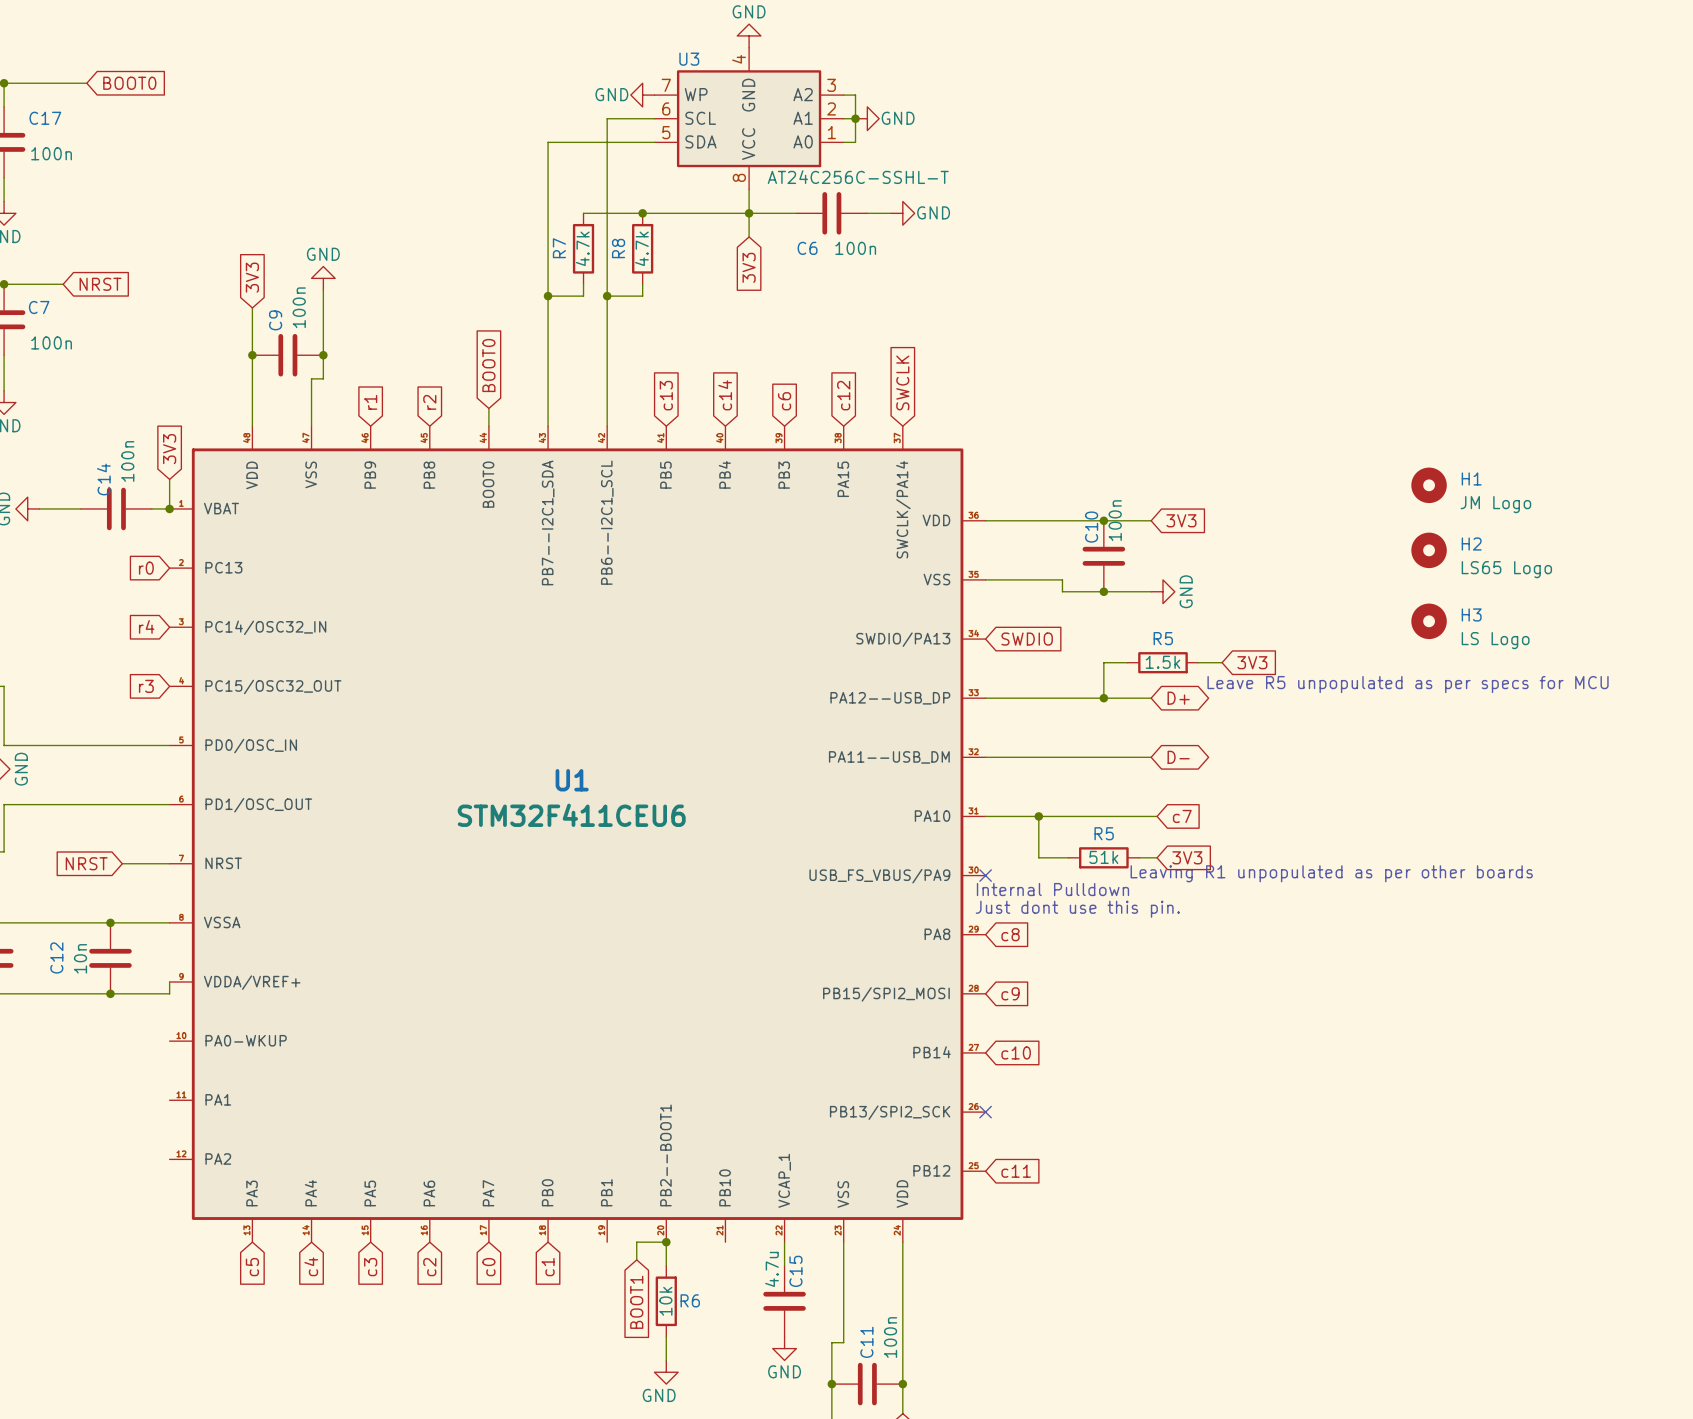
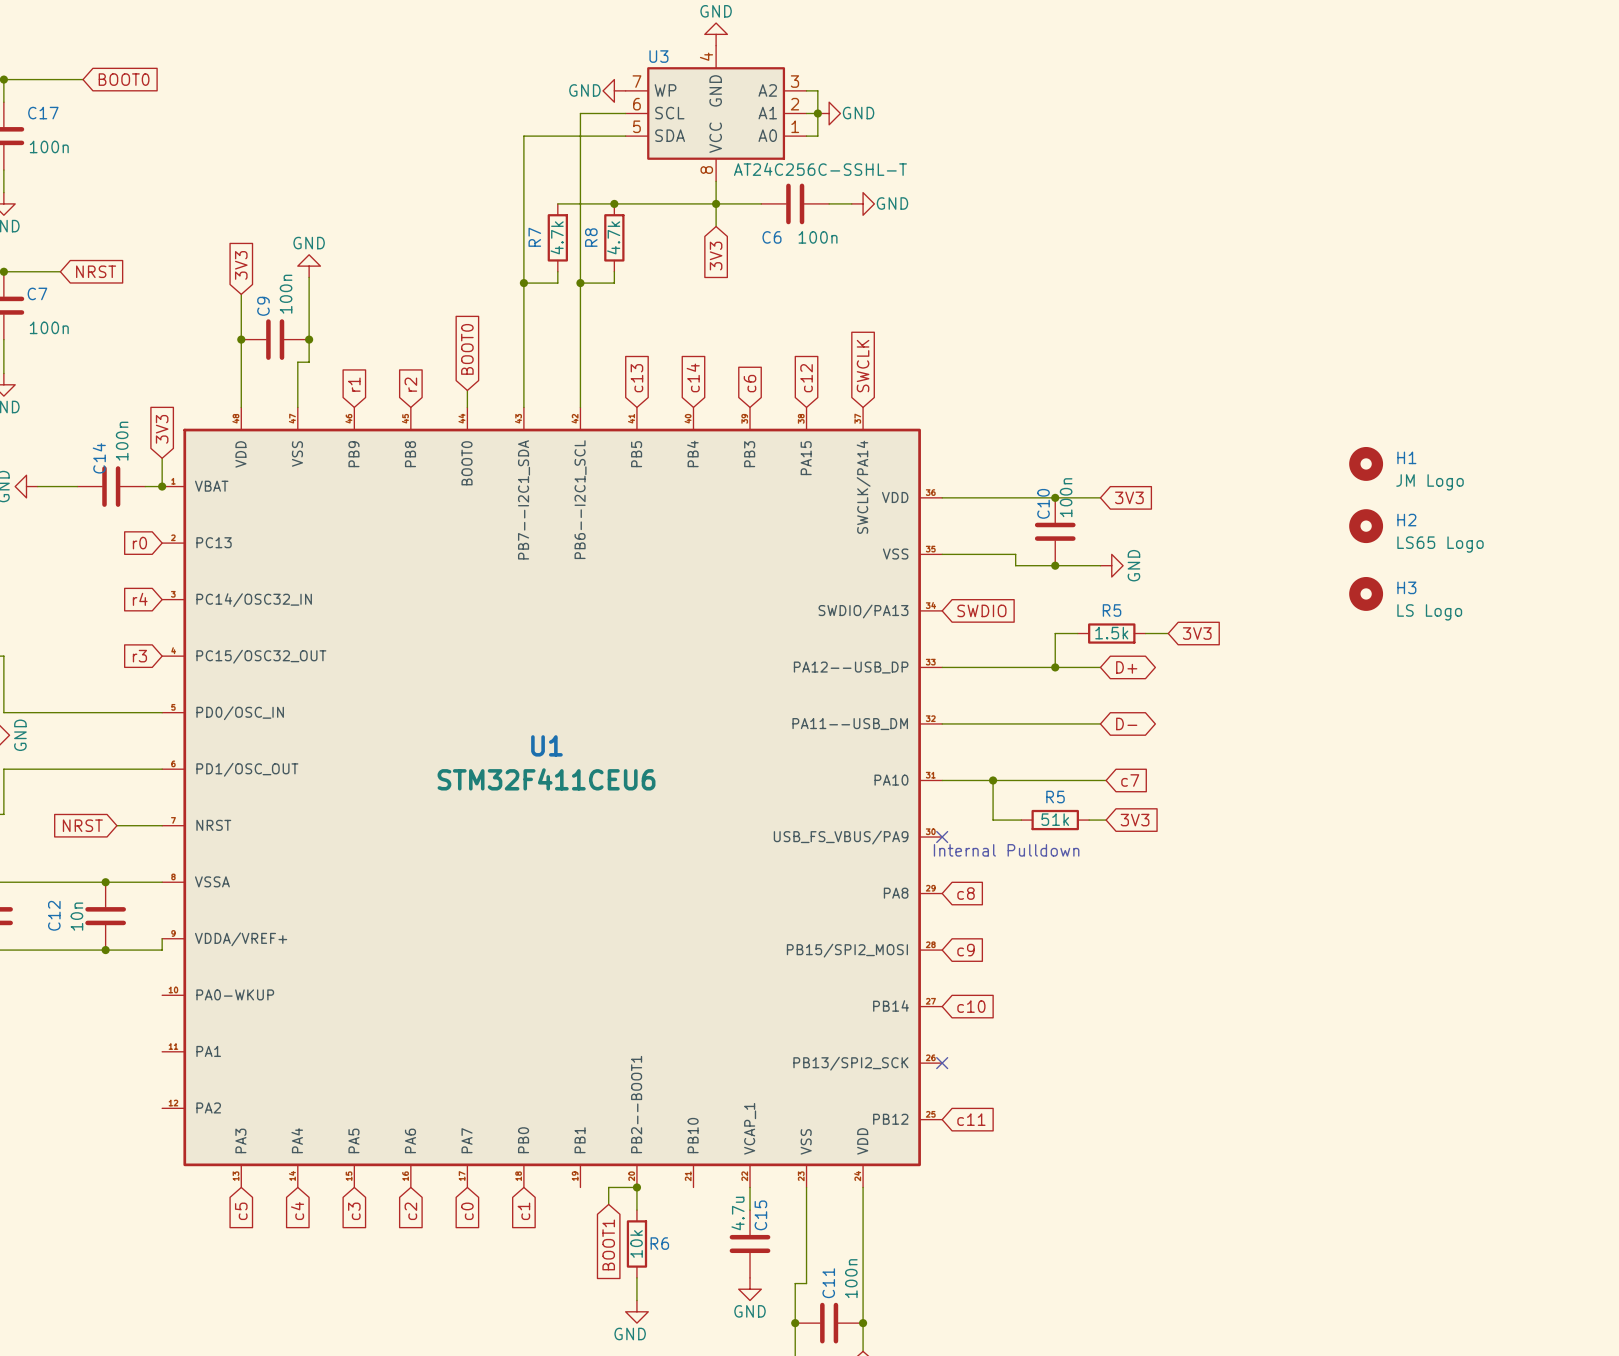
text: Leave R5 unpopulated as per specs for MCU (1408, 684) -> none
text: Leaving R1 unpopulated as per other boards (1331, 873) -> none
text: Just dont use this pin. (1077, 909) -> none

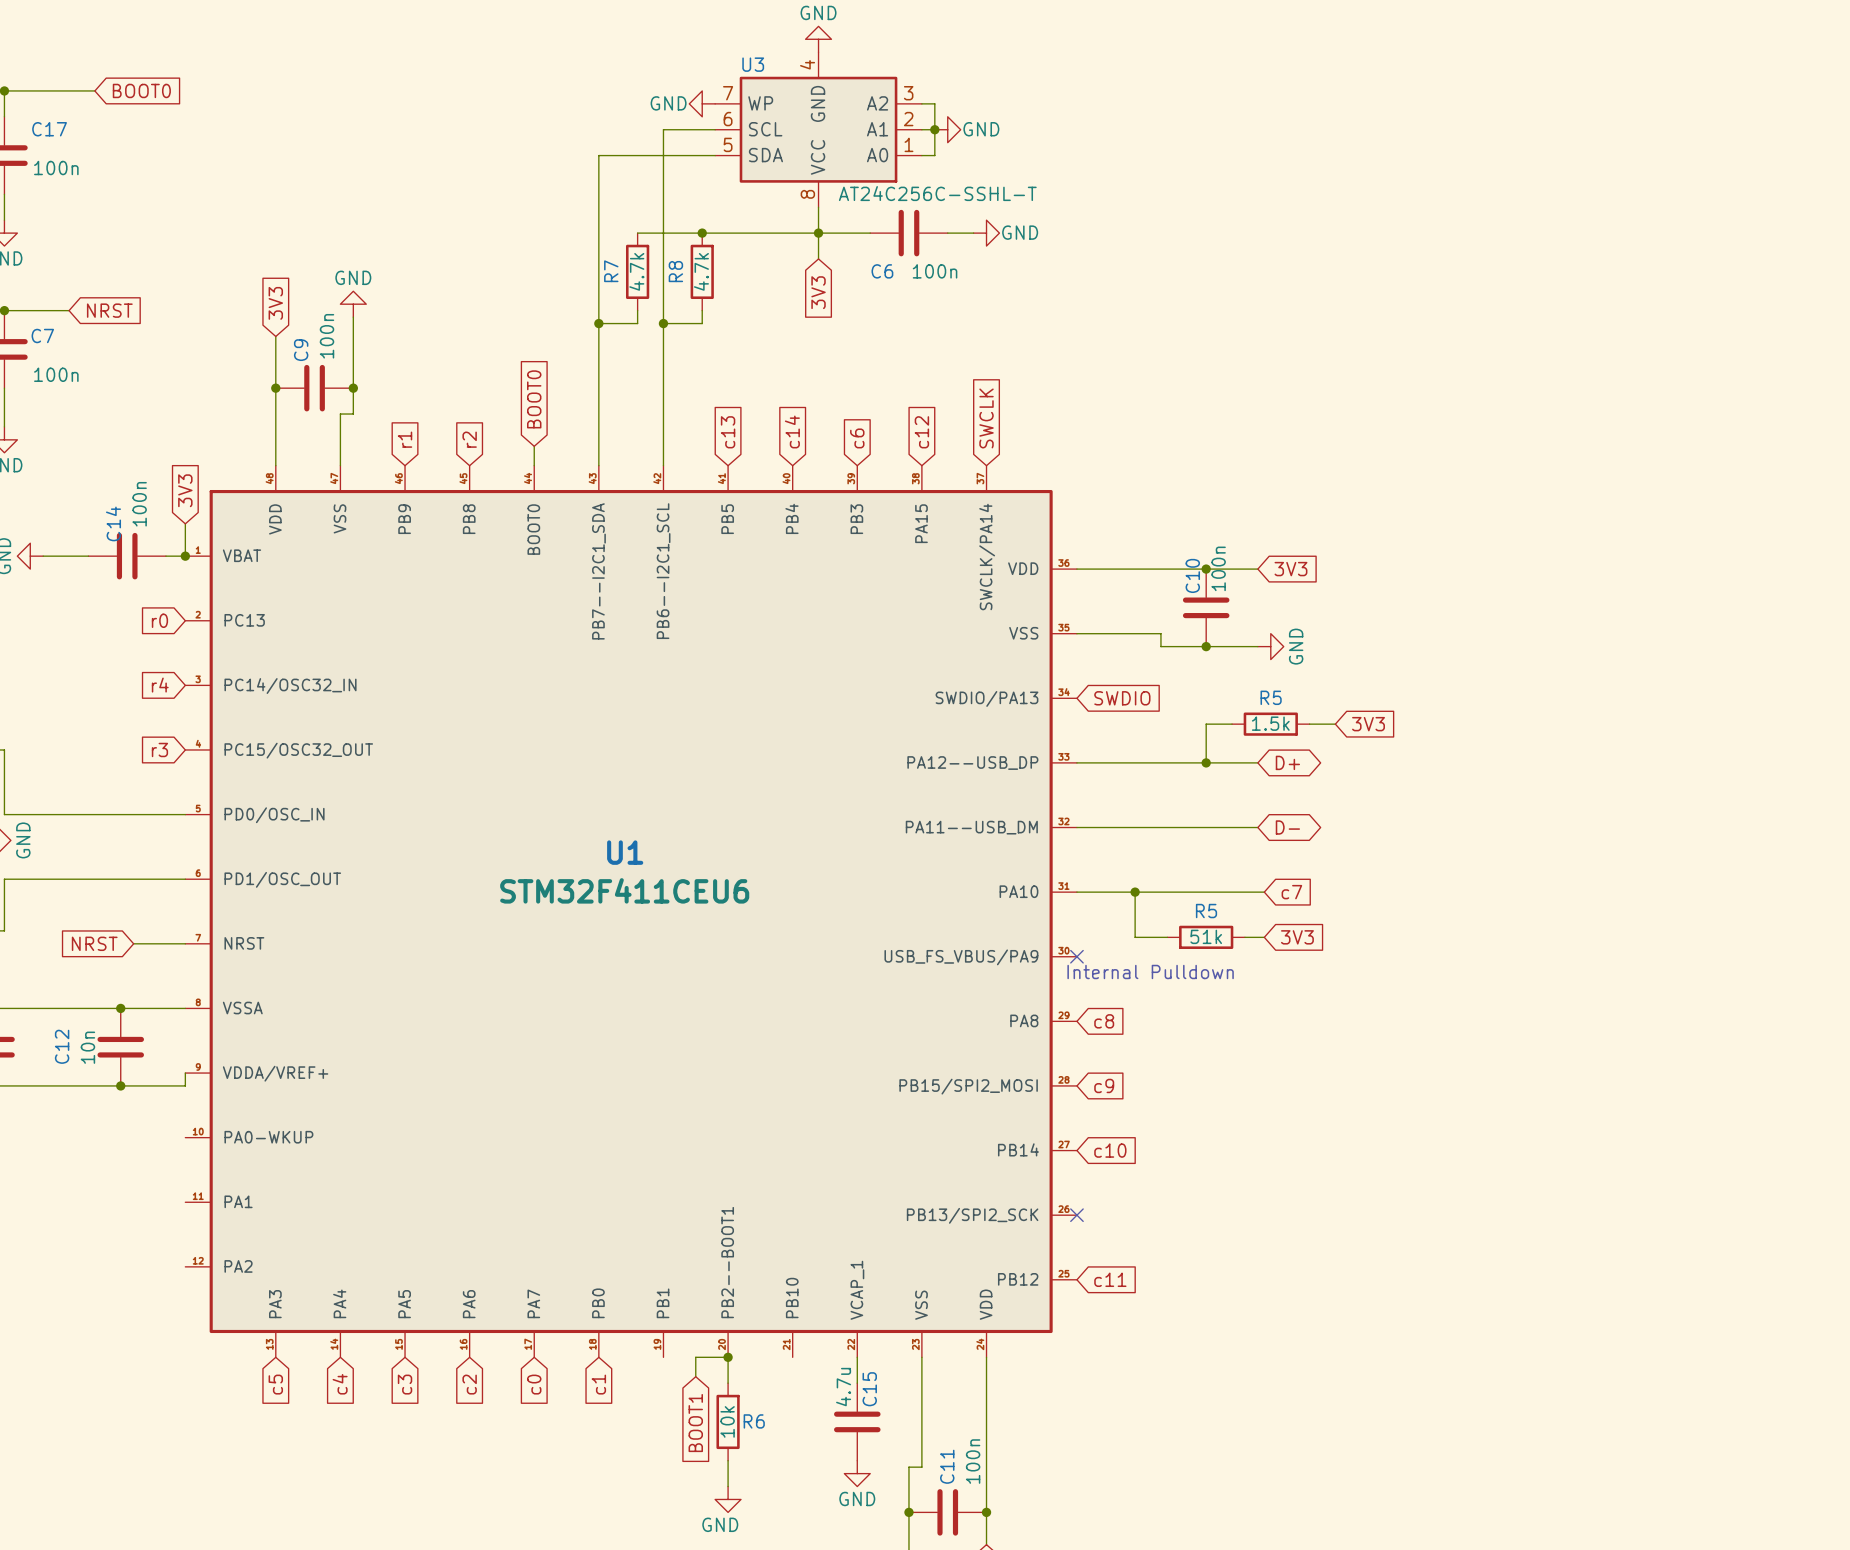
H1: JM Logo (1366, 463) -> none
H2: LS65 Logo (1366, 526) -> none
H3: LS Logo (1366, 593) -> none

